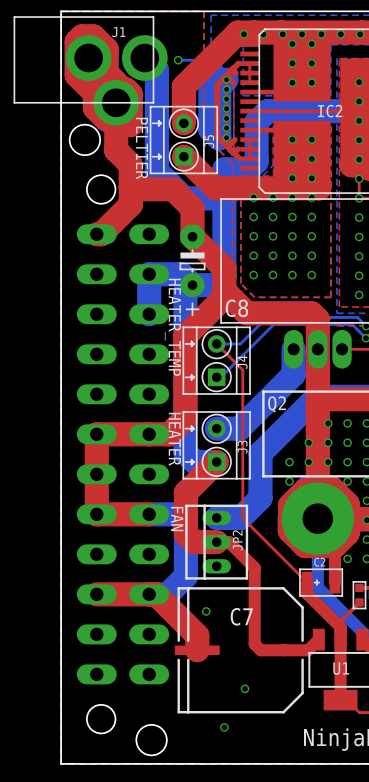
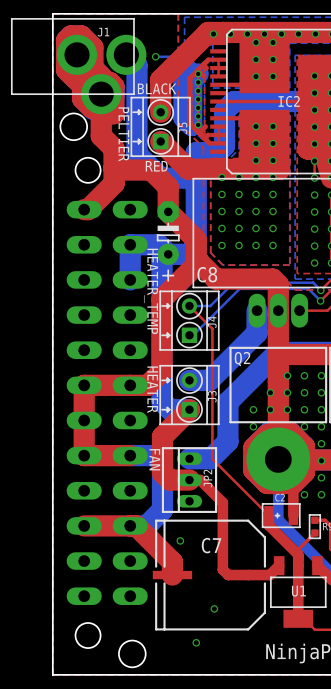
text: none -> BLACK (157, 88)
text: none -> RED (156, 166)

